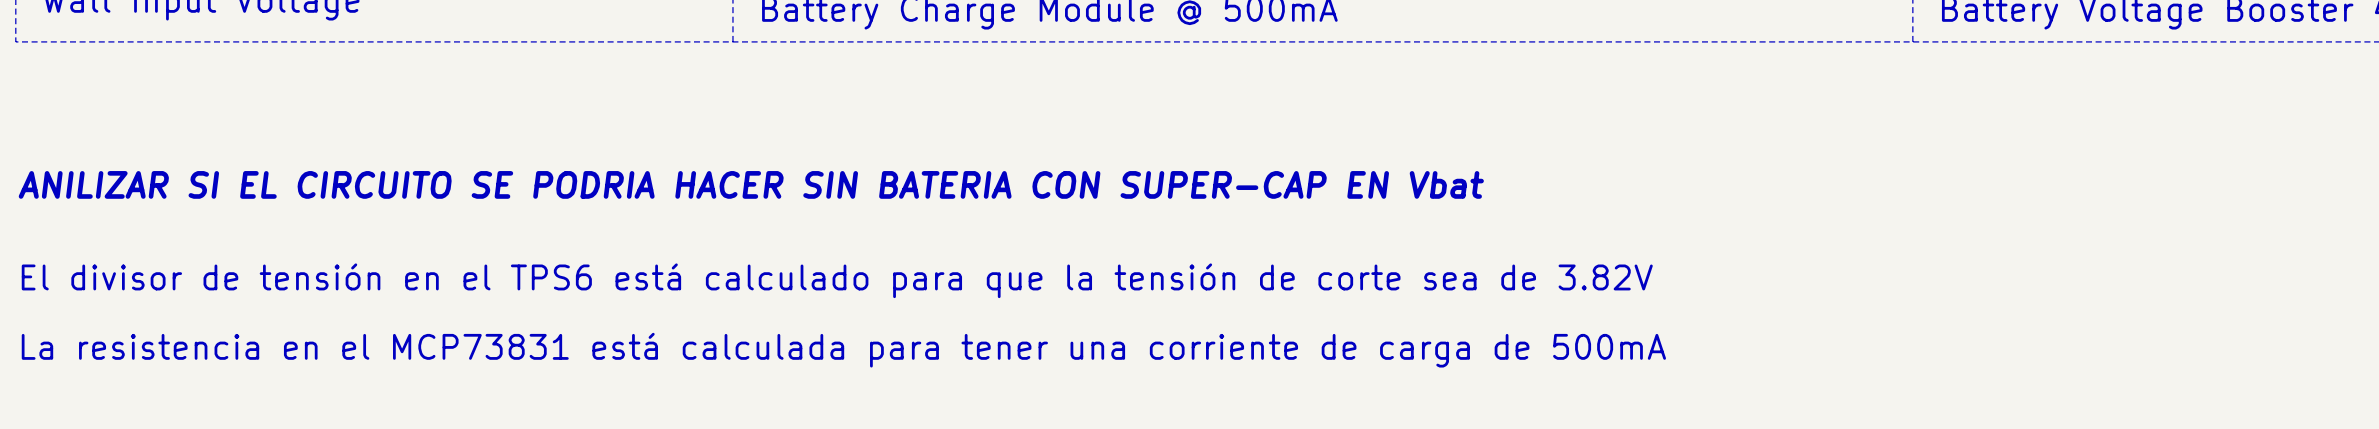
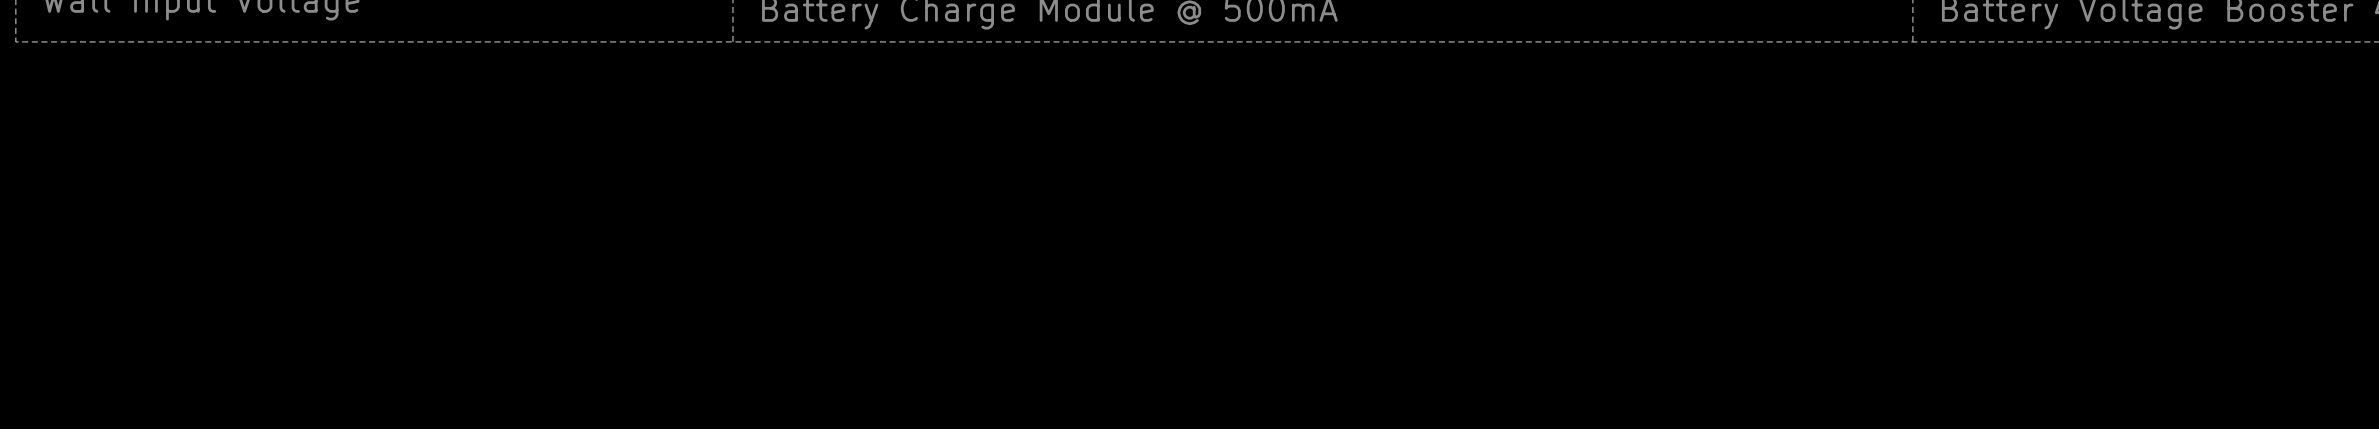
text: ANILIZAR SI EL CIRCUITO SE PODRIA HACER SIN BATERIA CON SUPER-CAP EN Vbat (751, 184) -> none
text: El divisor de tensión en el TPS6 está calculado para que la tensión de corte sea de 3.82V (837, 280) -> none
text: La resistencia en el MCP73831 está calculada para tener una corriente de carga de 500mA (843, 350) -> none

